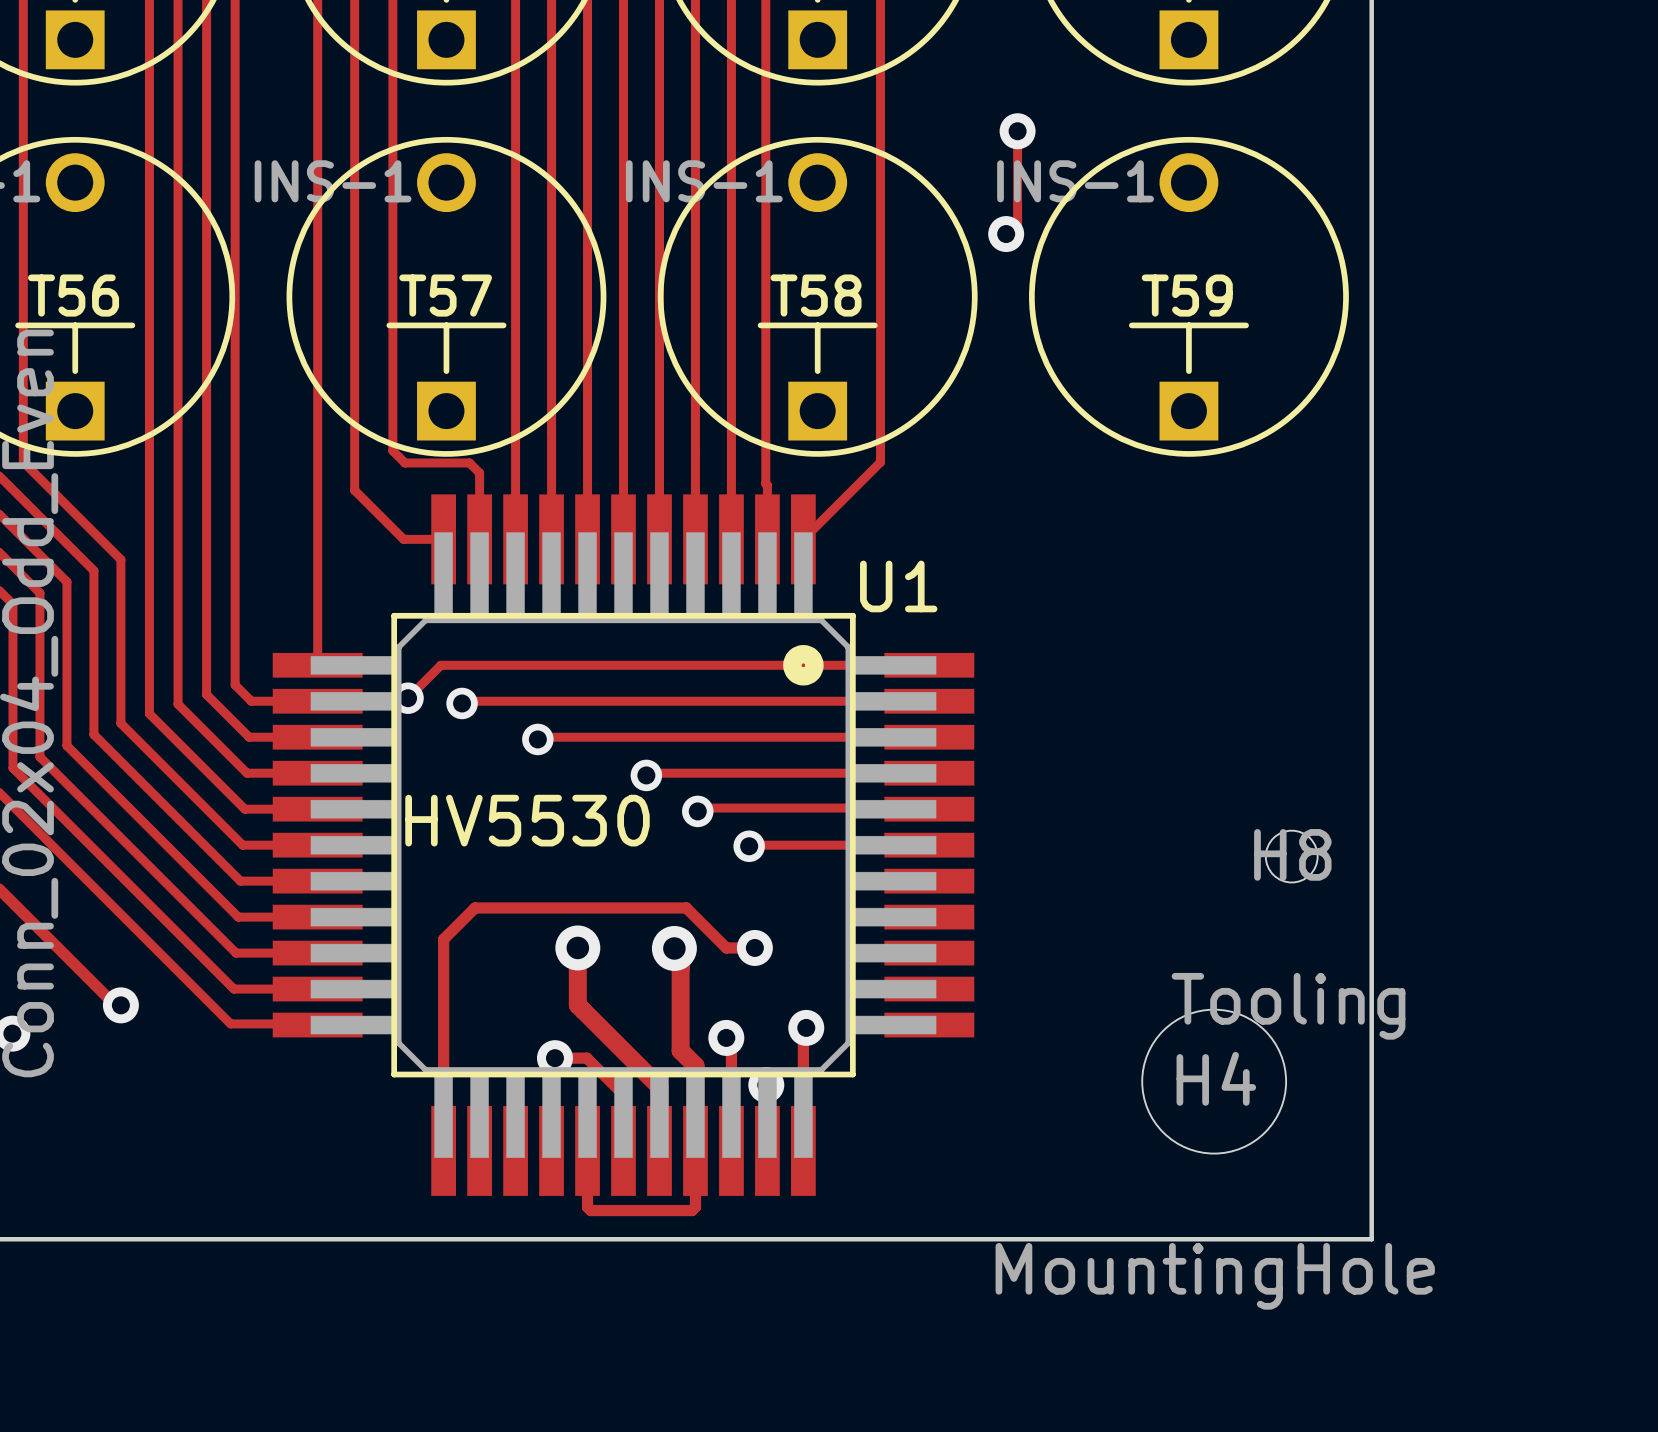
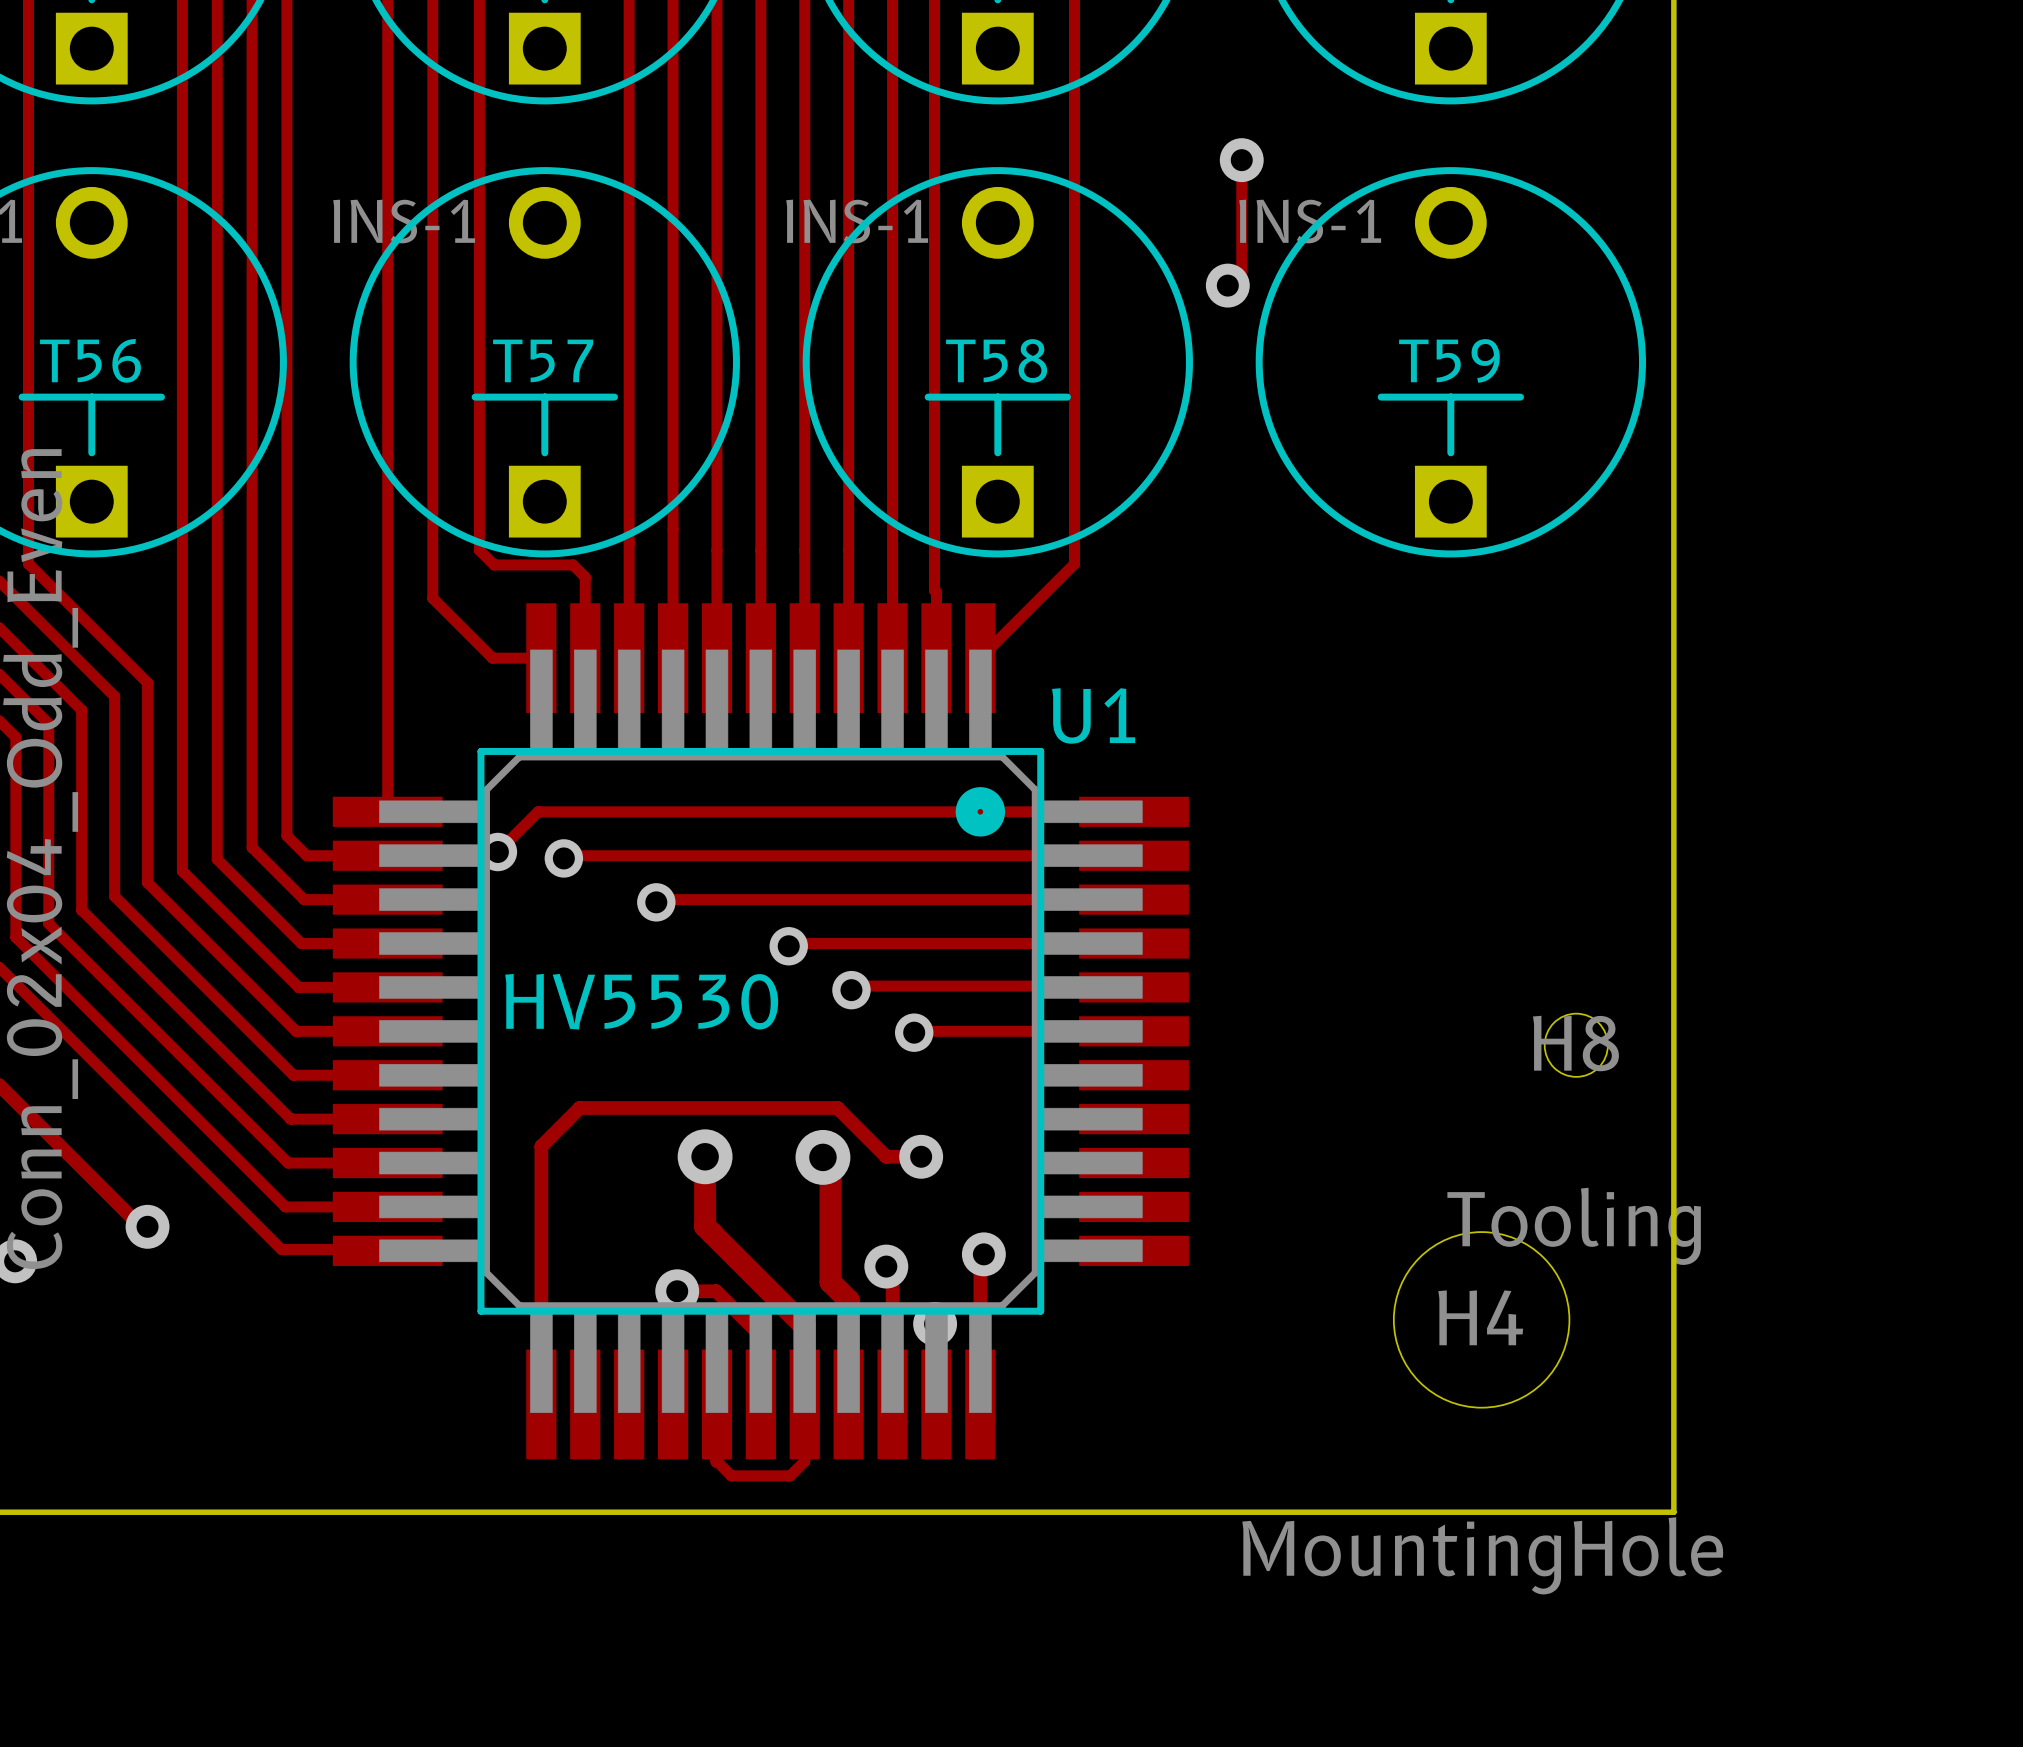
track: (695, 1150) (695, 1207) (692, 1210) (590, 1210) (587, 1207) (587, 1197) -> (804, 1404) (804, 1461) (790, 1475) (731, 1475) (716, 1461)

